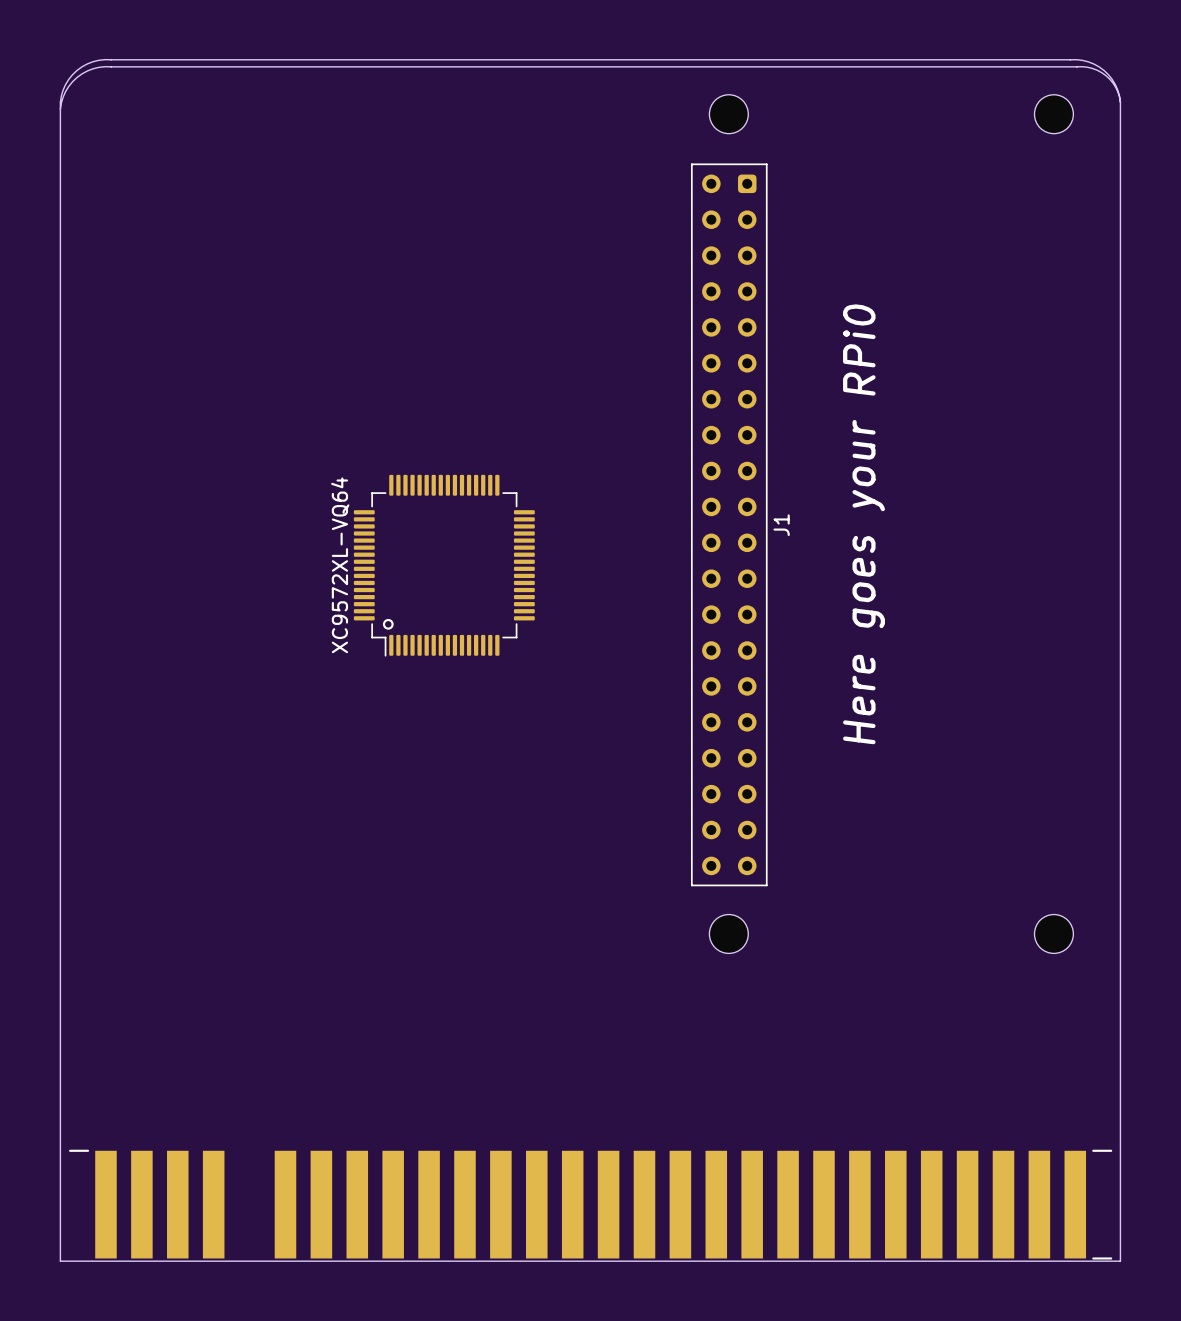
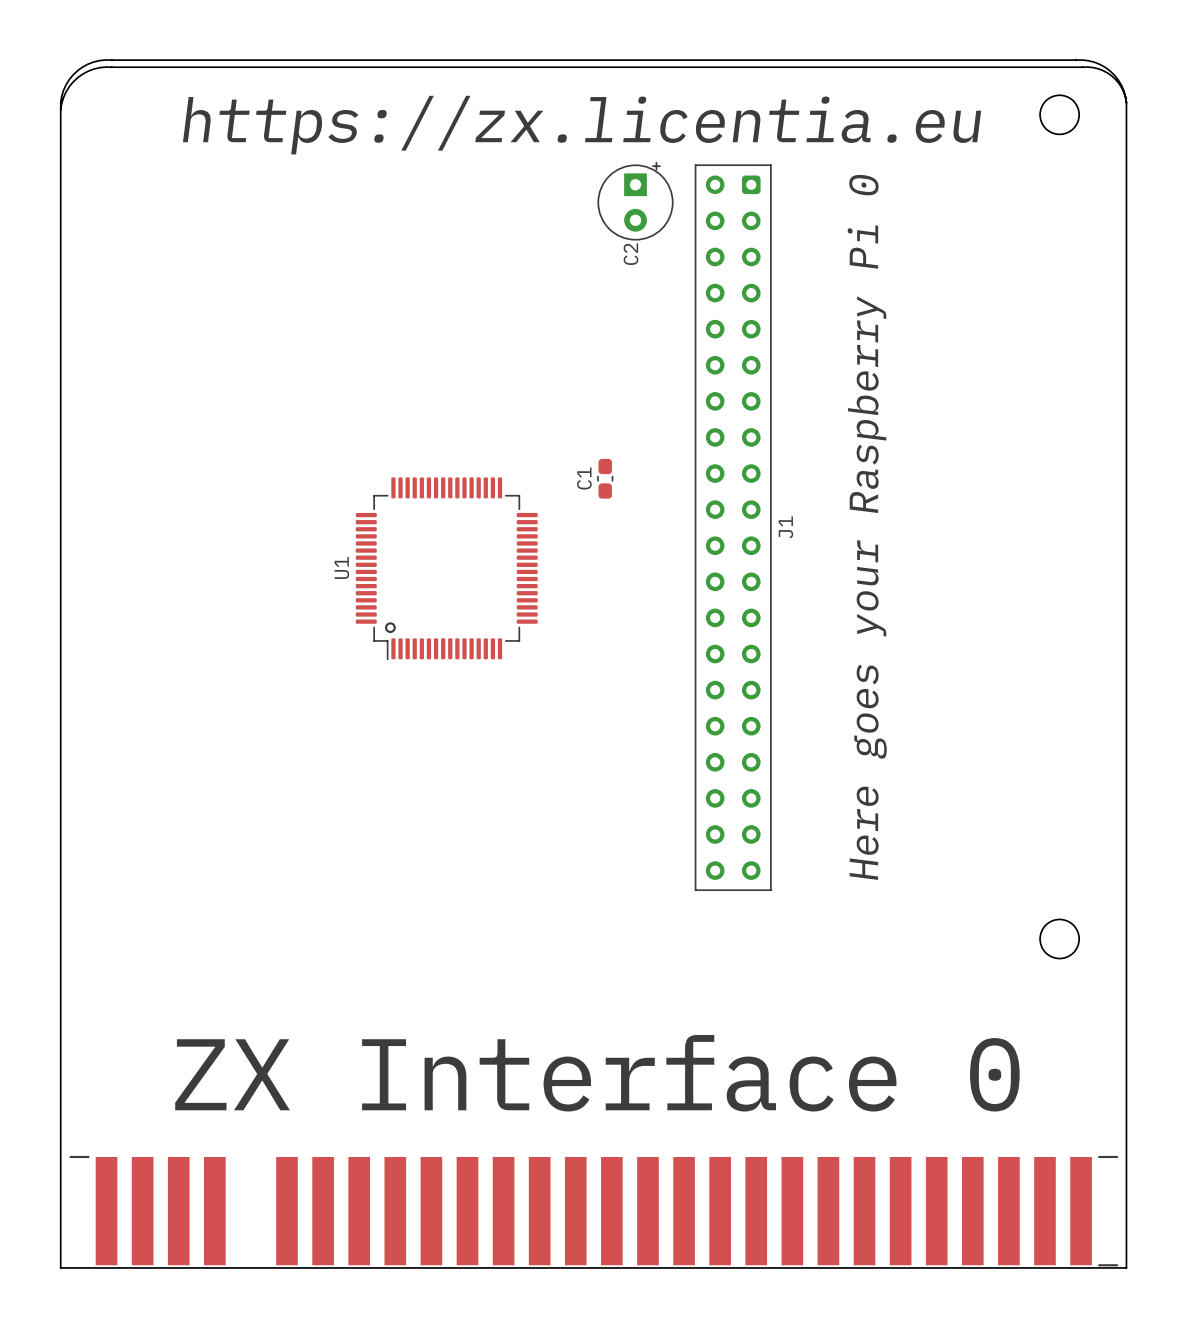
part: (728, 114) -> none
text: none -> https://zx.licentia.eu (582, 125)
C2: none -> (635, 201)
C1: none -> (605, 478)
text: Here goes your RPi0 (864, 524) -> Here goes your Raspberry Pi 0 (867, 527)
XC9572XL-VQ64 name: XC9572XL-VQ64 (340, 565) -> U1 (341, 568)
part: (728, 933) -> none
text: none -> ZX Interface 0 (597, 1073)

